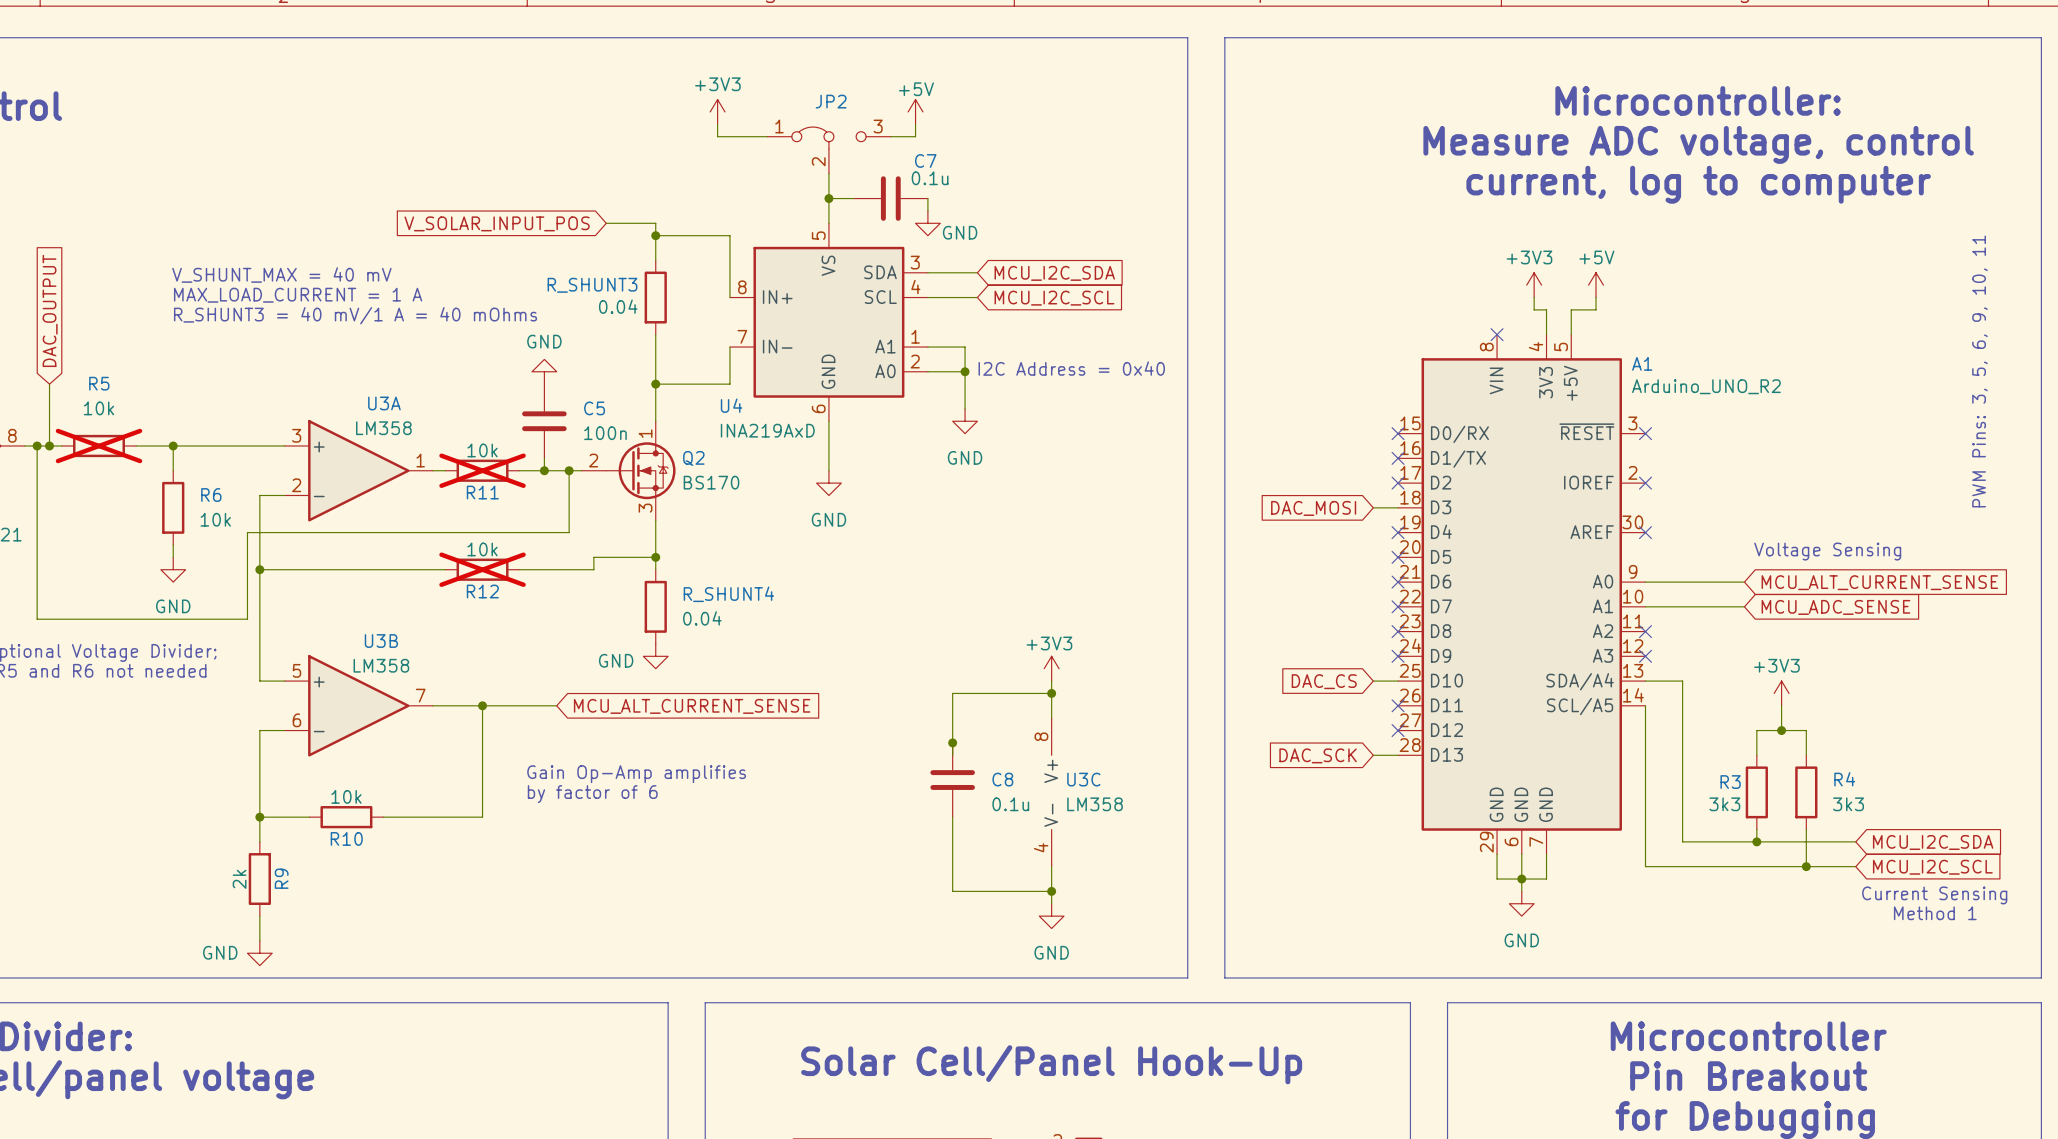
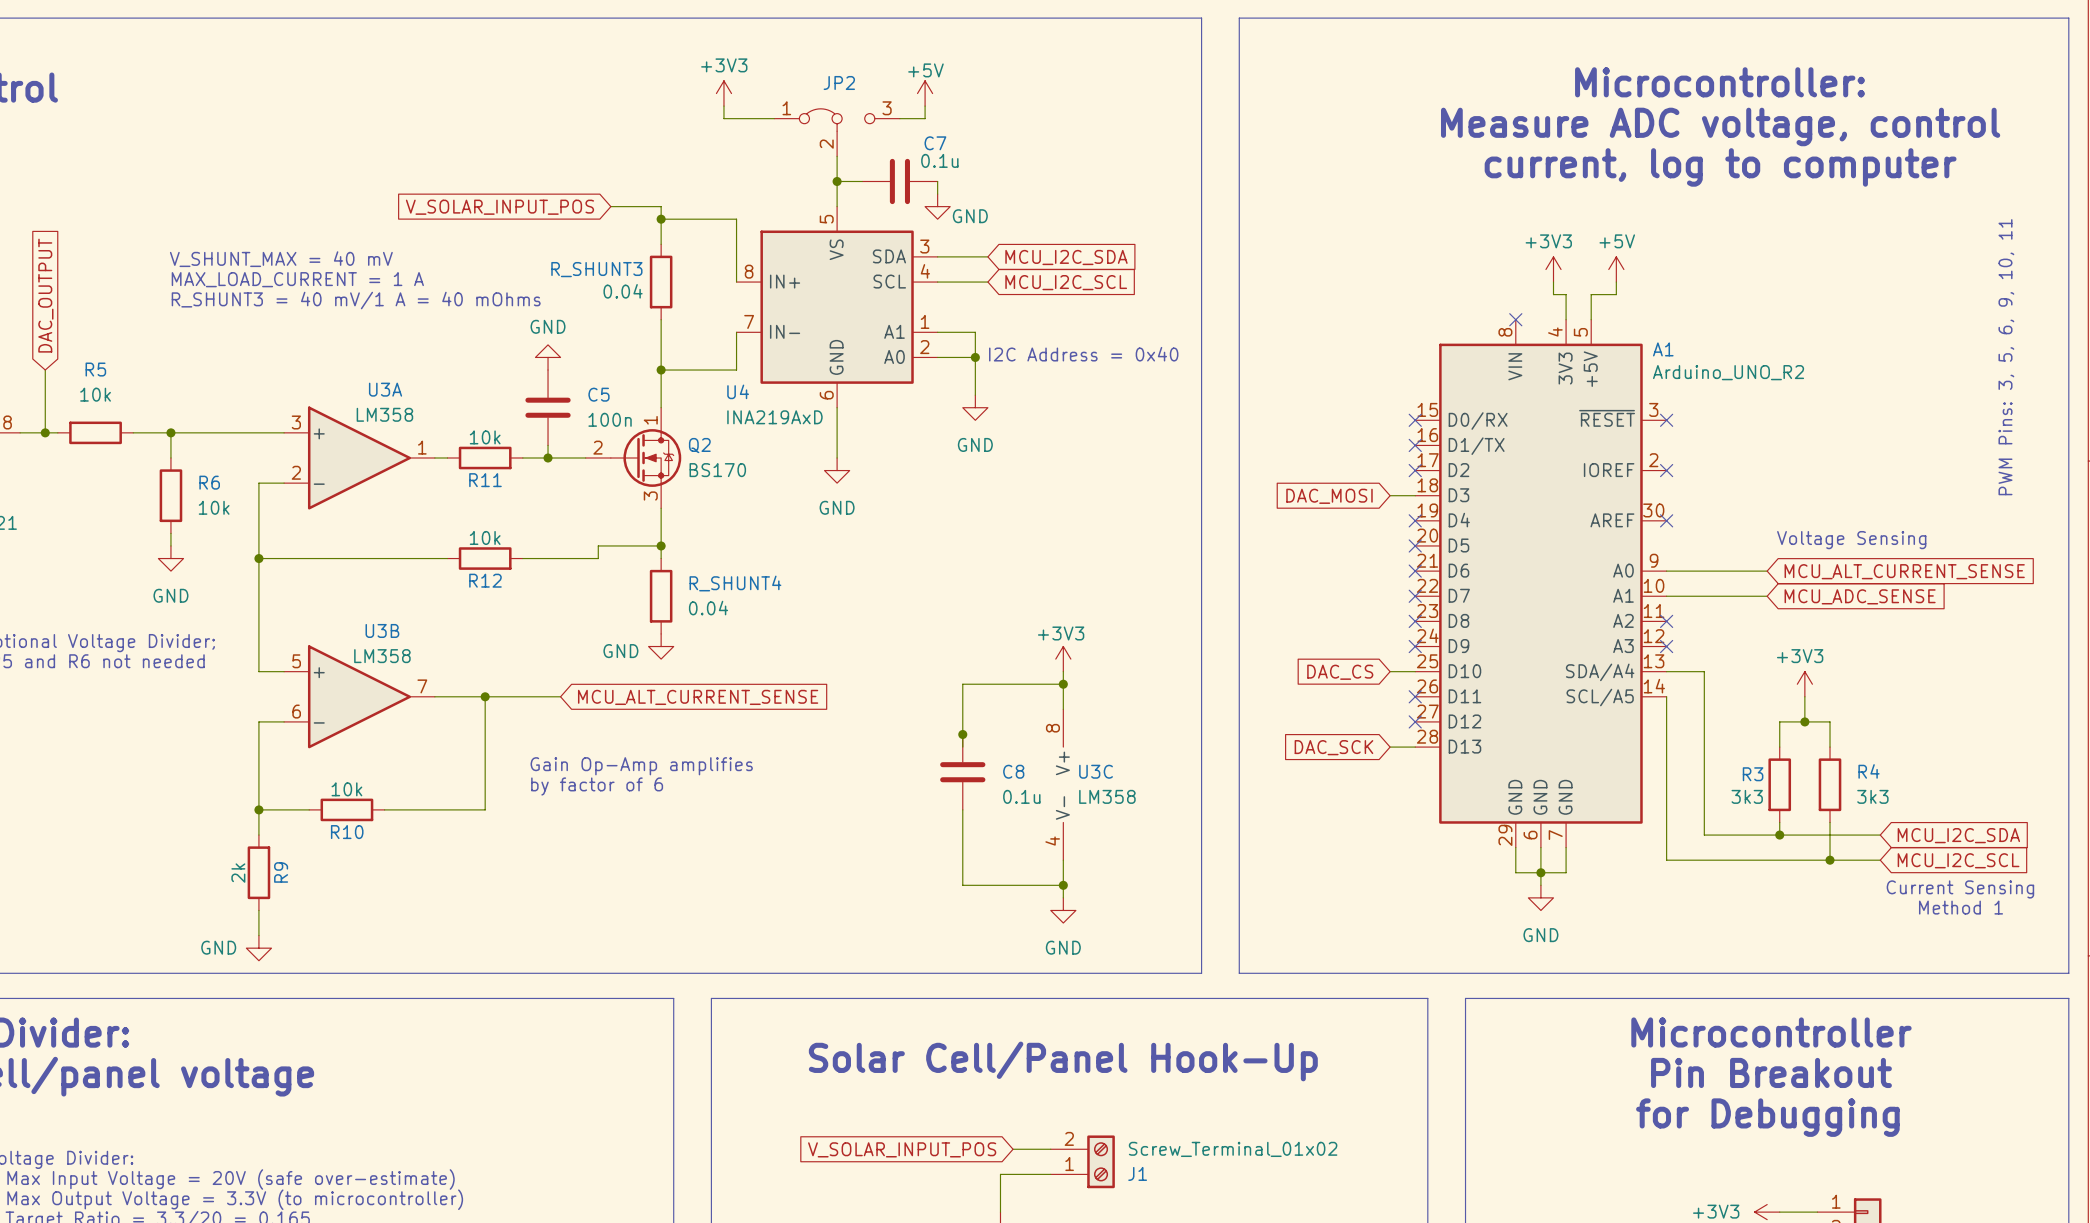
wire: (37, 445) (37, 619) (247, 619) (247, 532) (569, 532) (569, 470) -> none
junction: (37, 445) -> none
R5 do-not-place cross: (99, 445) -> none
R11 do-not-place cross: (482, 470) -> none
junction: (569, 470) -> none
R12 do-not-place cross: (482, 569) -> none

